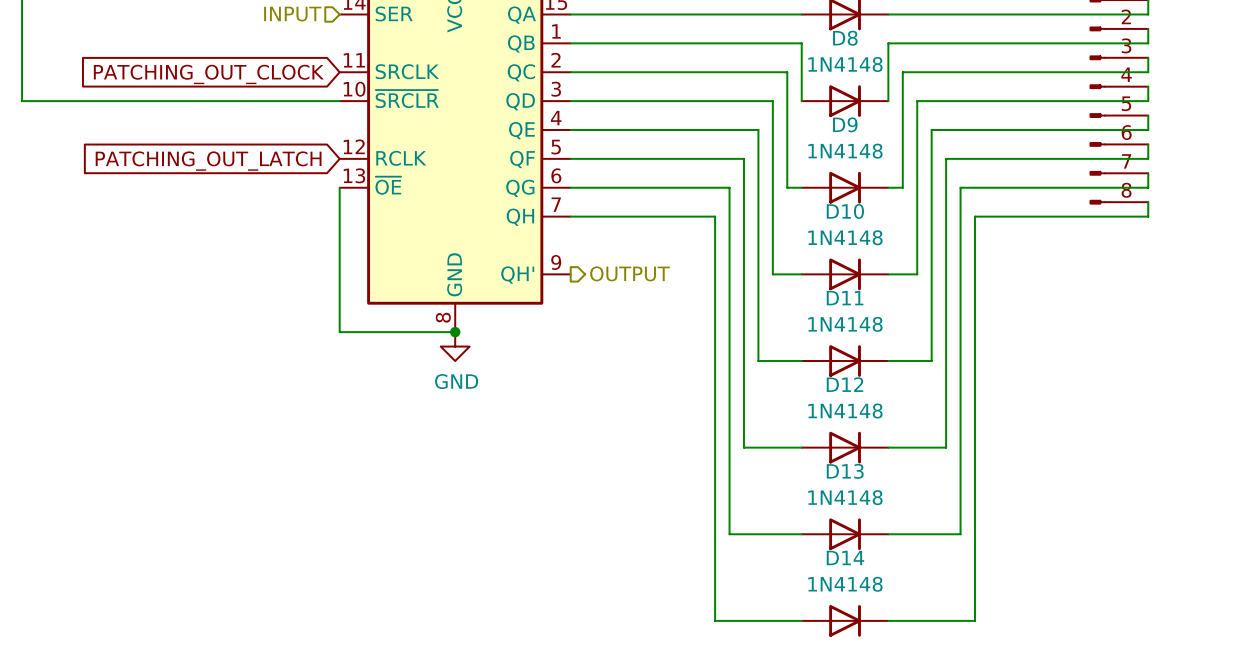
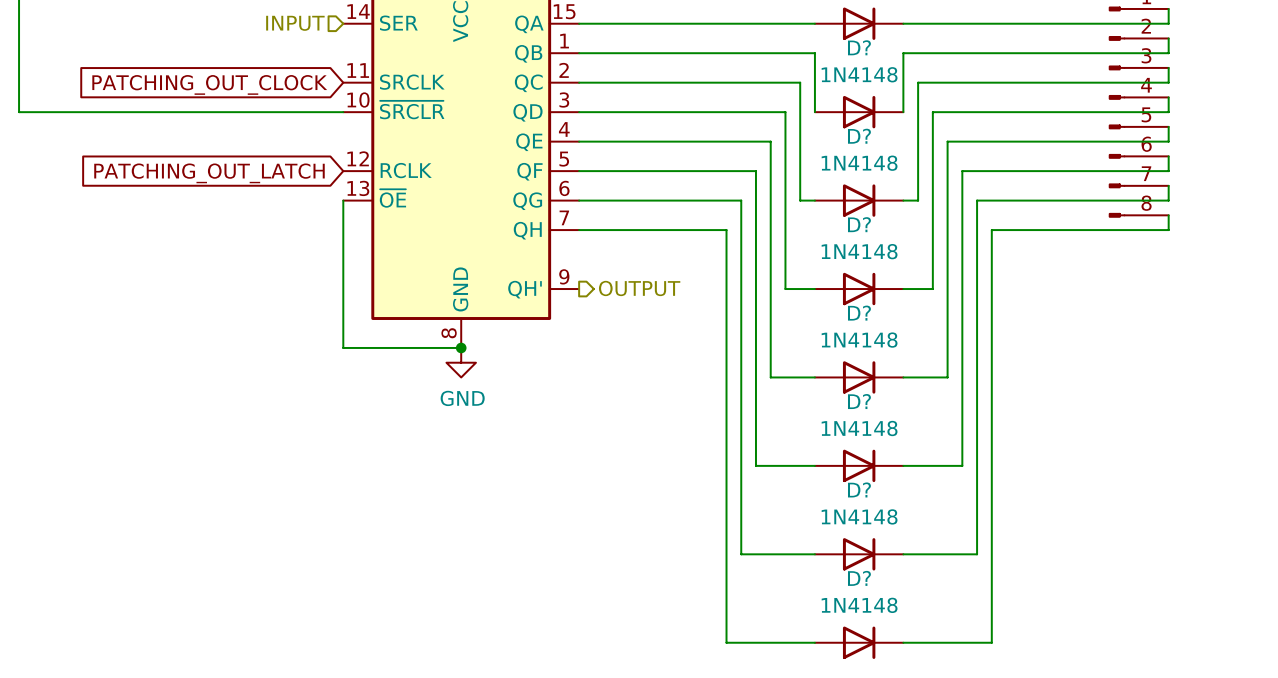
D8 name: D8 (845, 38) -> D? (859, 47)
D9 name: D9 (845, 124) -> D? (859, 136)
D10 name: D10 (845, 211) -> D? (859, 224)
D11 name: D11 (845, 298) -> D? (859, 313)
D12 name: D12 (845, 384) -> D? (859, 401)
D13 name: D13 (845, 471) -> D? (859, 489)
D14 name: D14 (845, 557) -> D? (859, 578)

